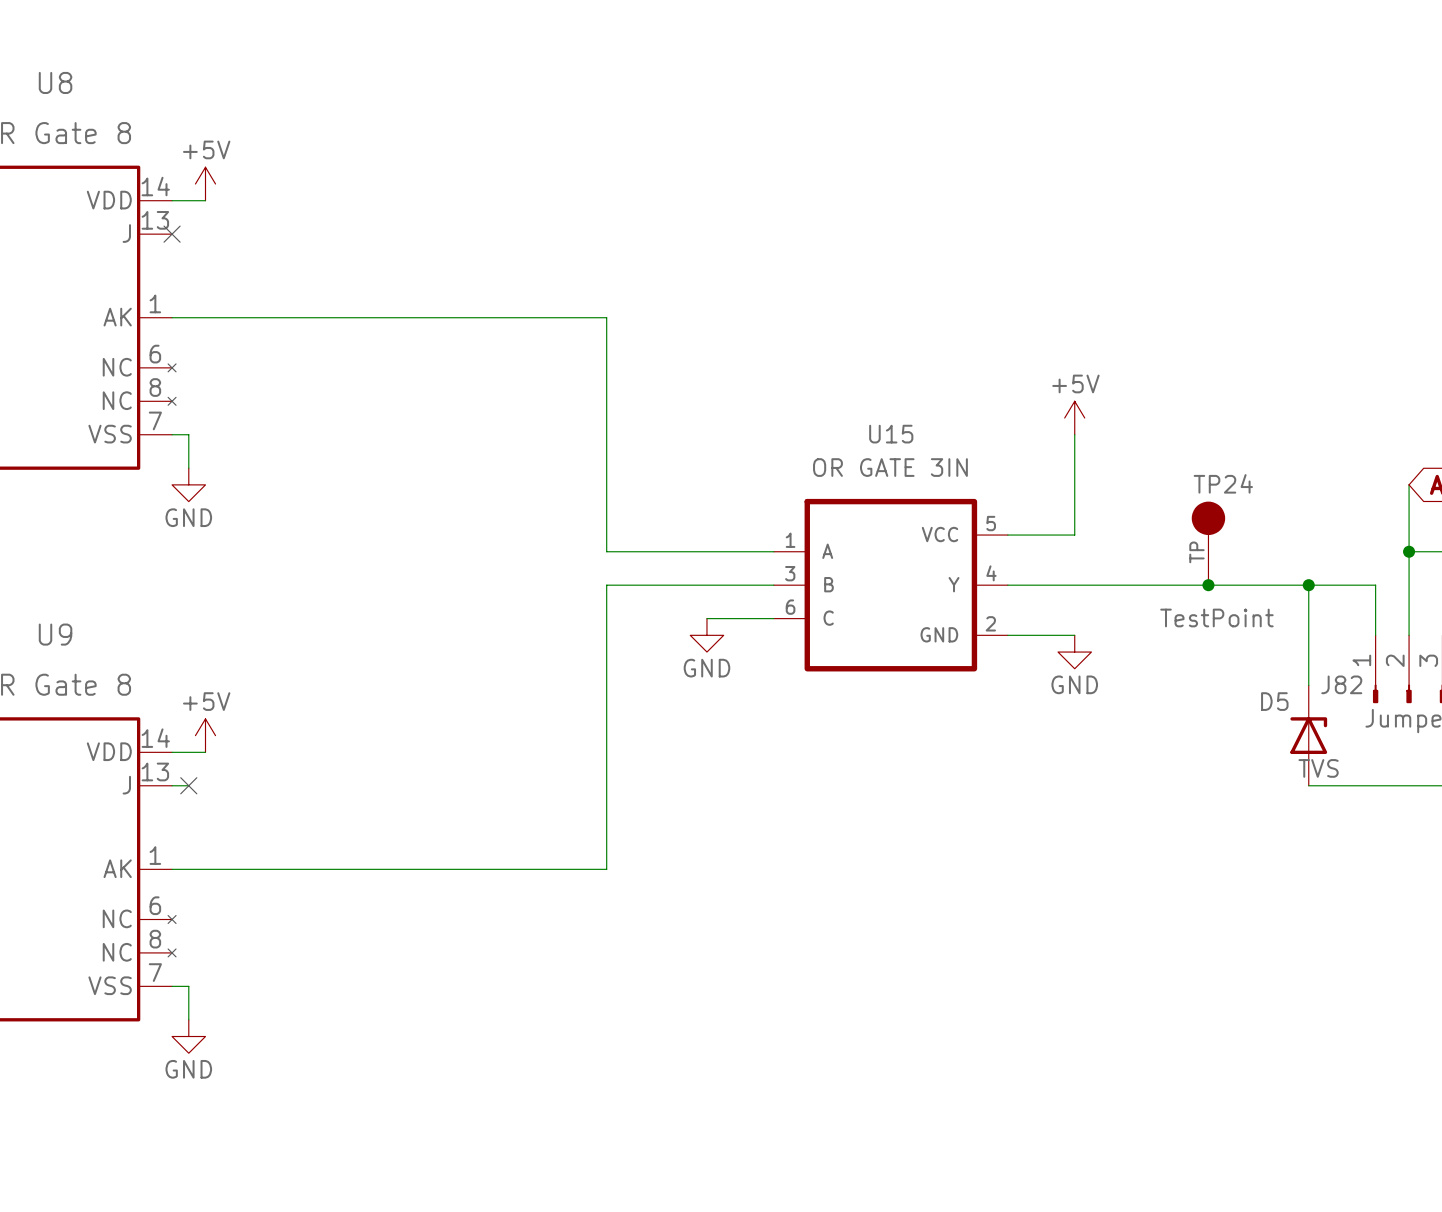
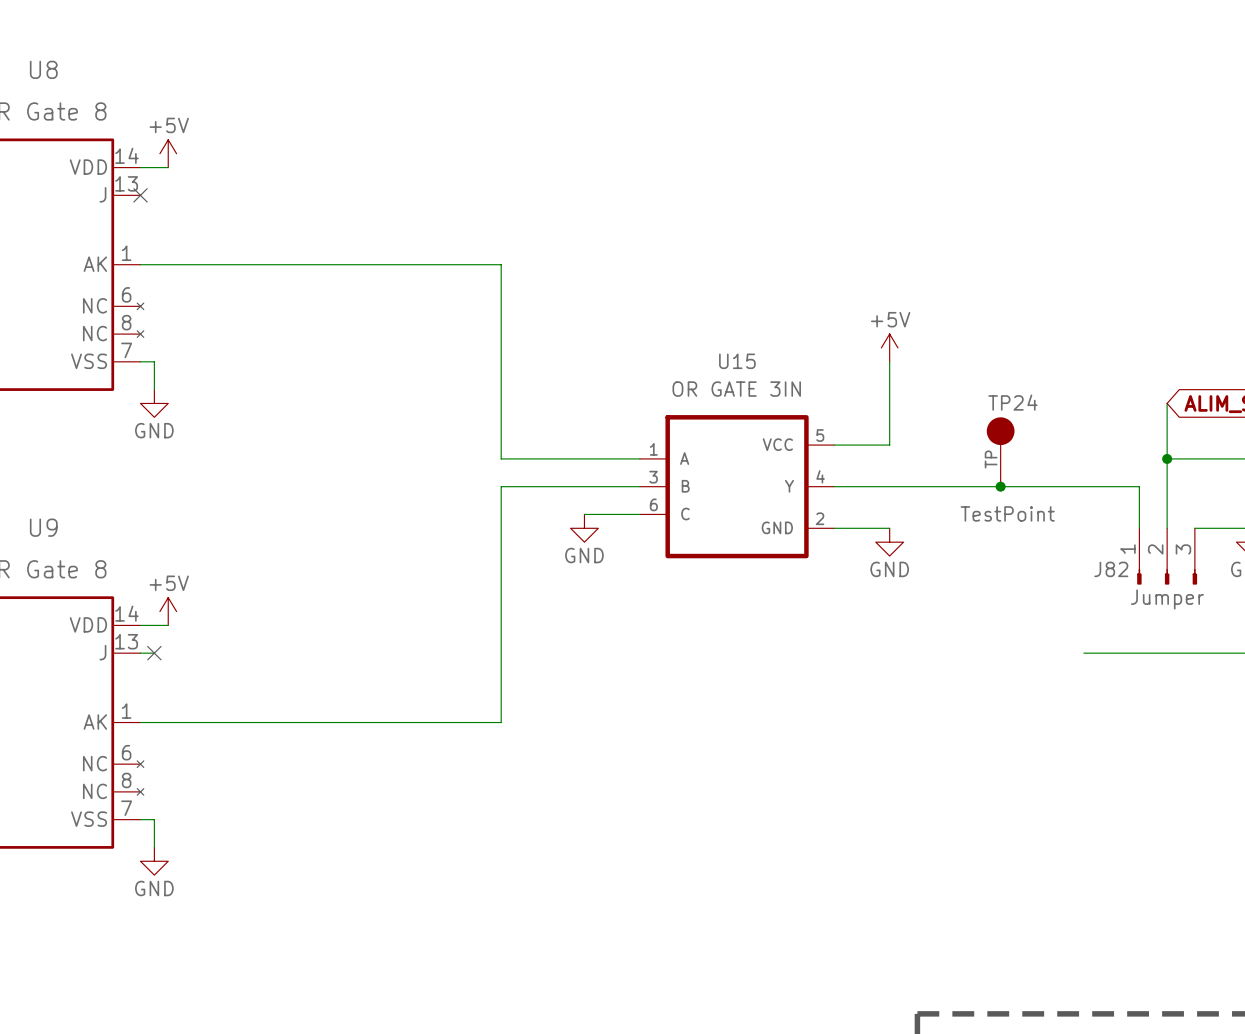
wire: (1308, 585) (1308, 685) -> none
junction: (1308, 585) -> none
D5: TVS (1308, 735) -> none

